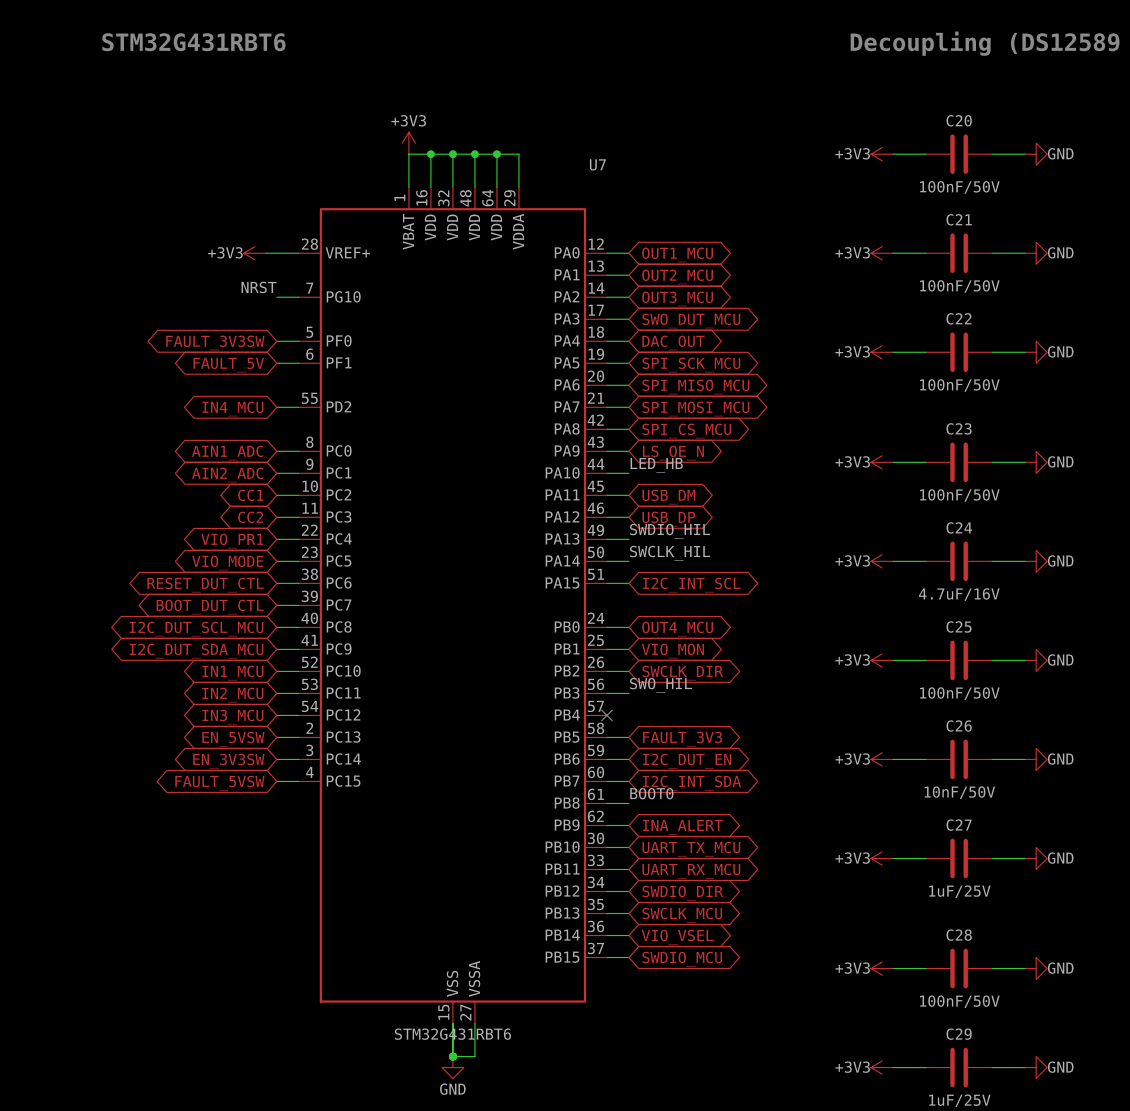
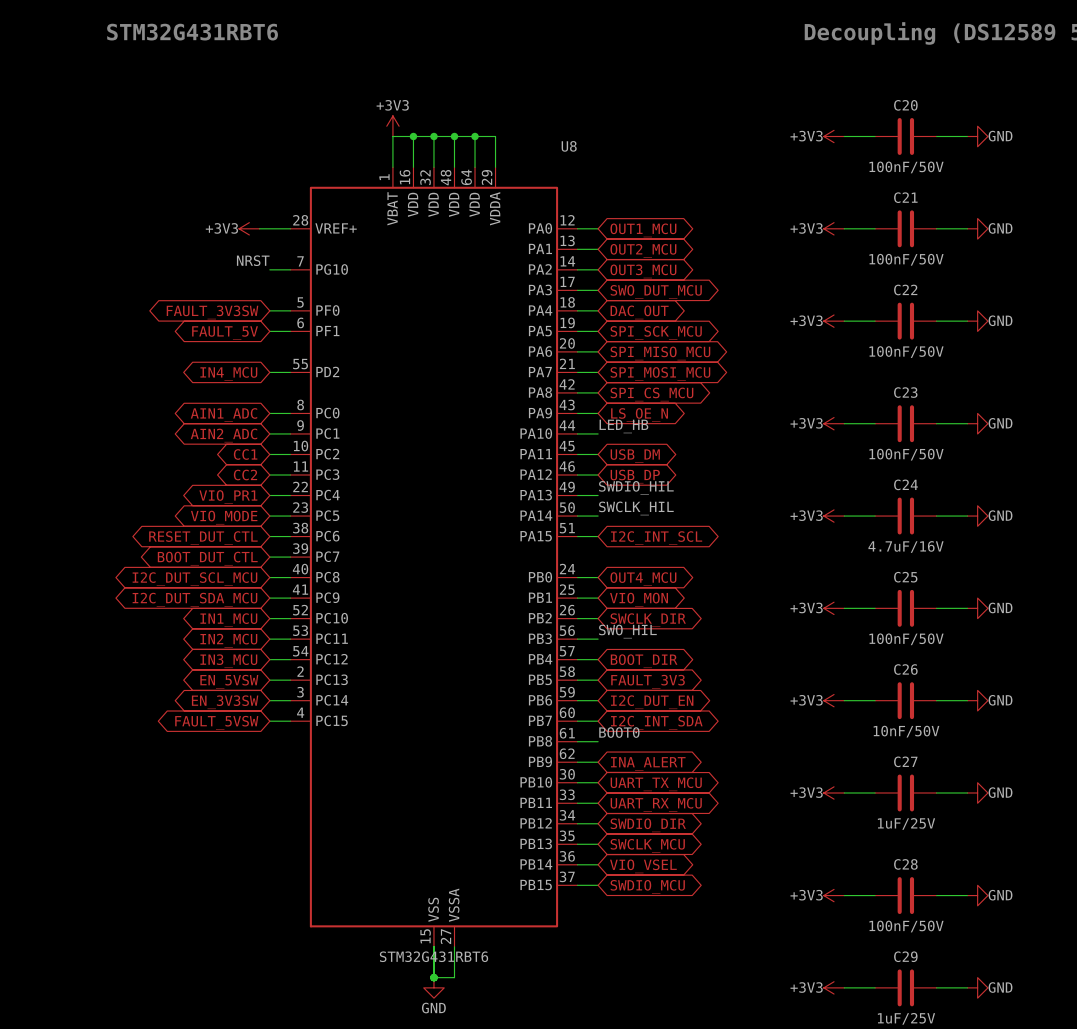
U7 name: U7 (597, 164) -> U8 (569, 146)
wire: none -> (577, 659) (598, 659)
no-connect mark: (606, 715) -> none
global label: none -> BOOT_DIR (644, 661)

